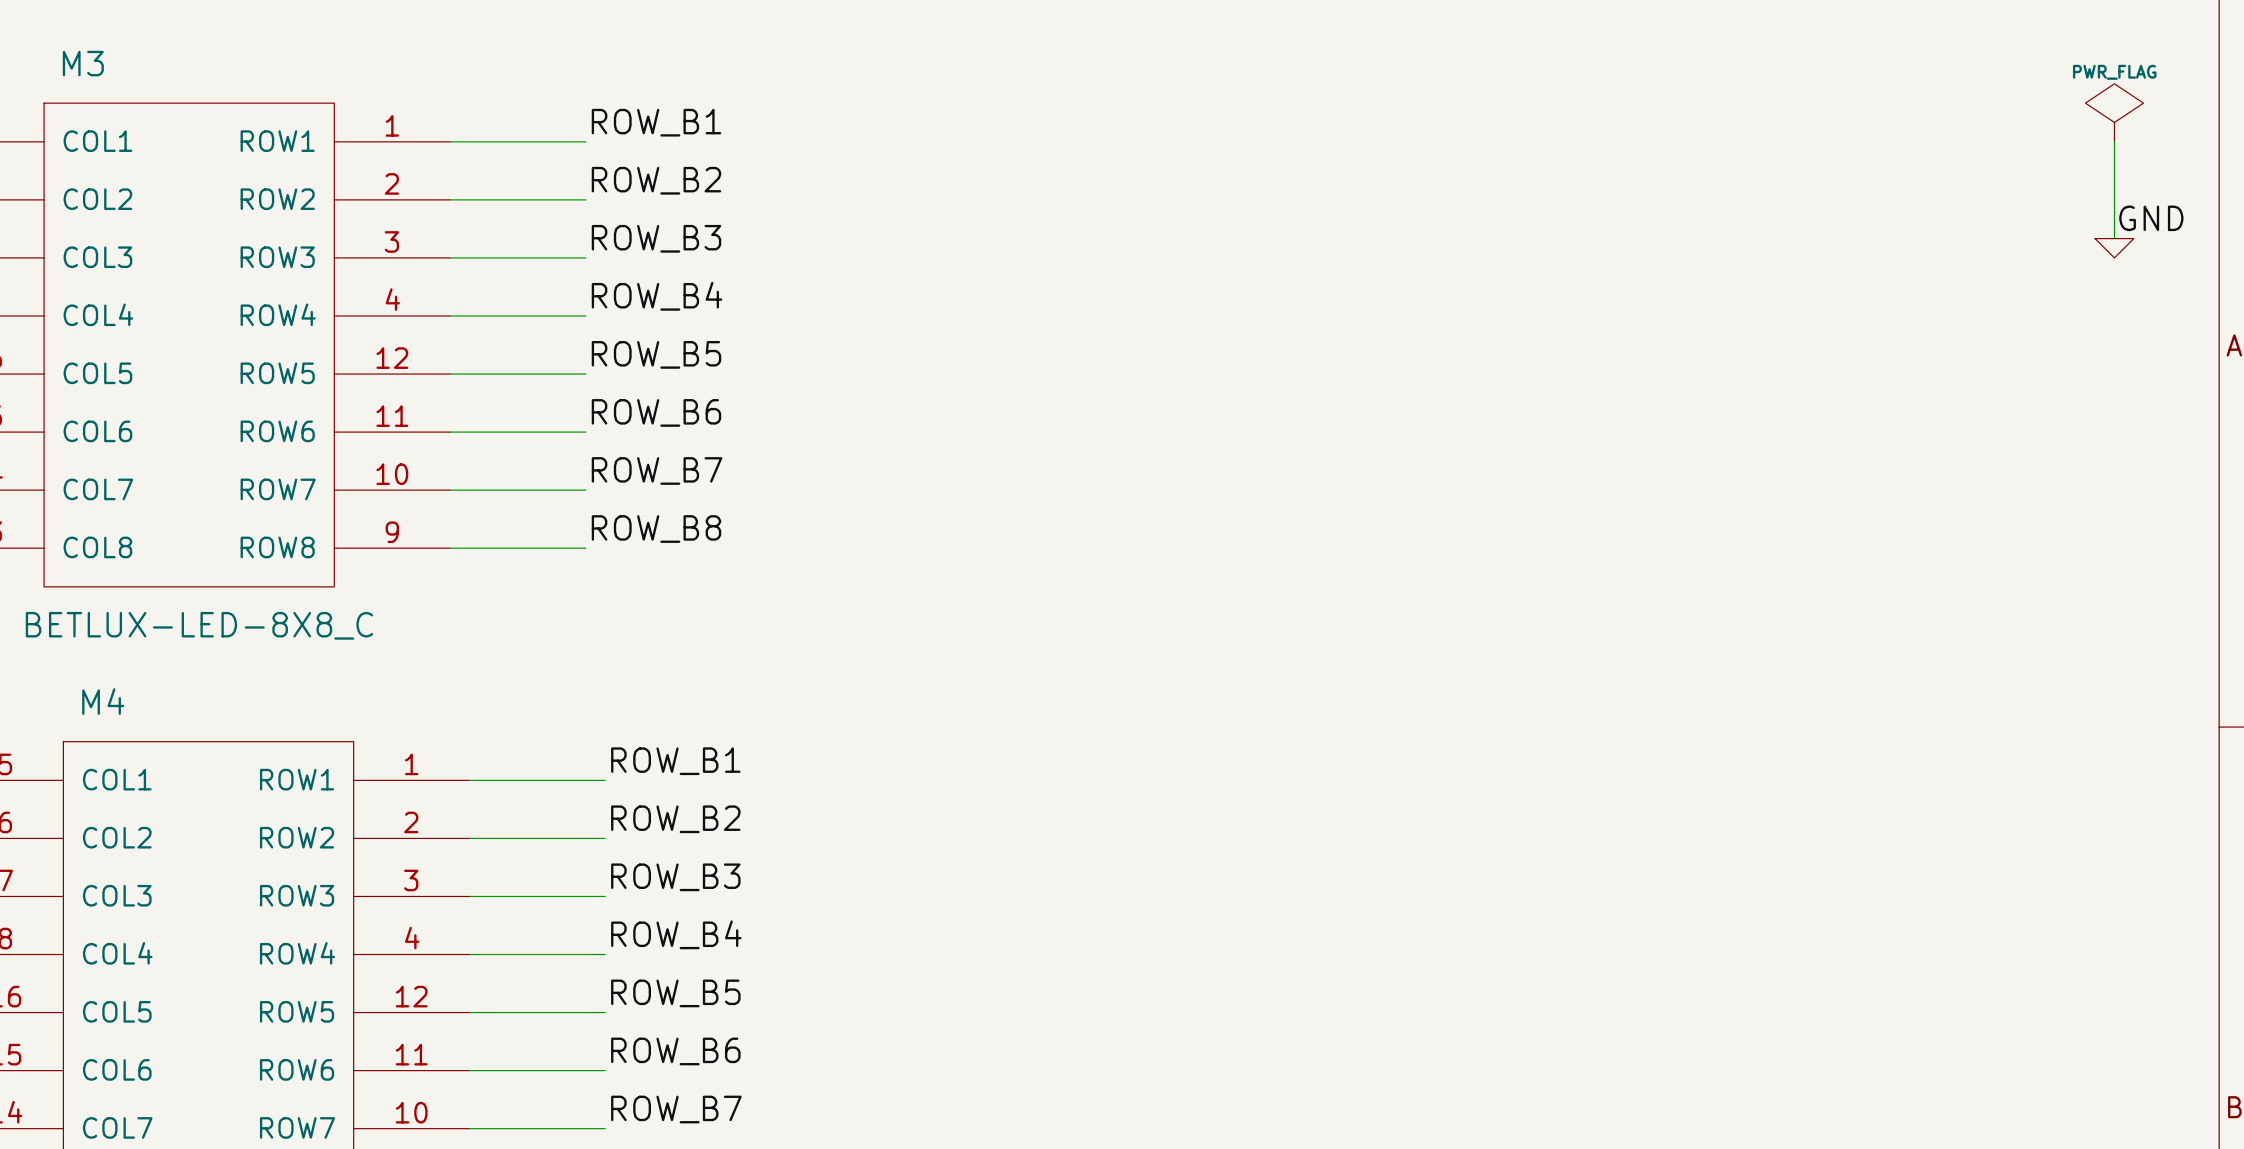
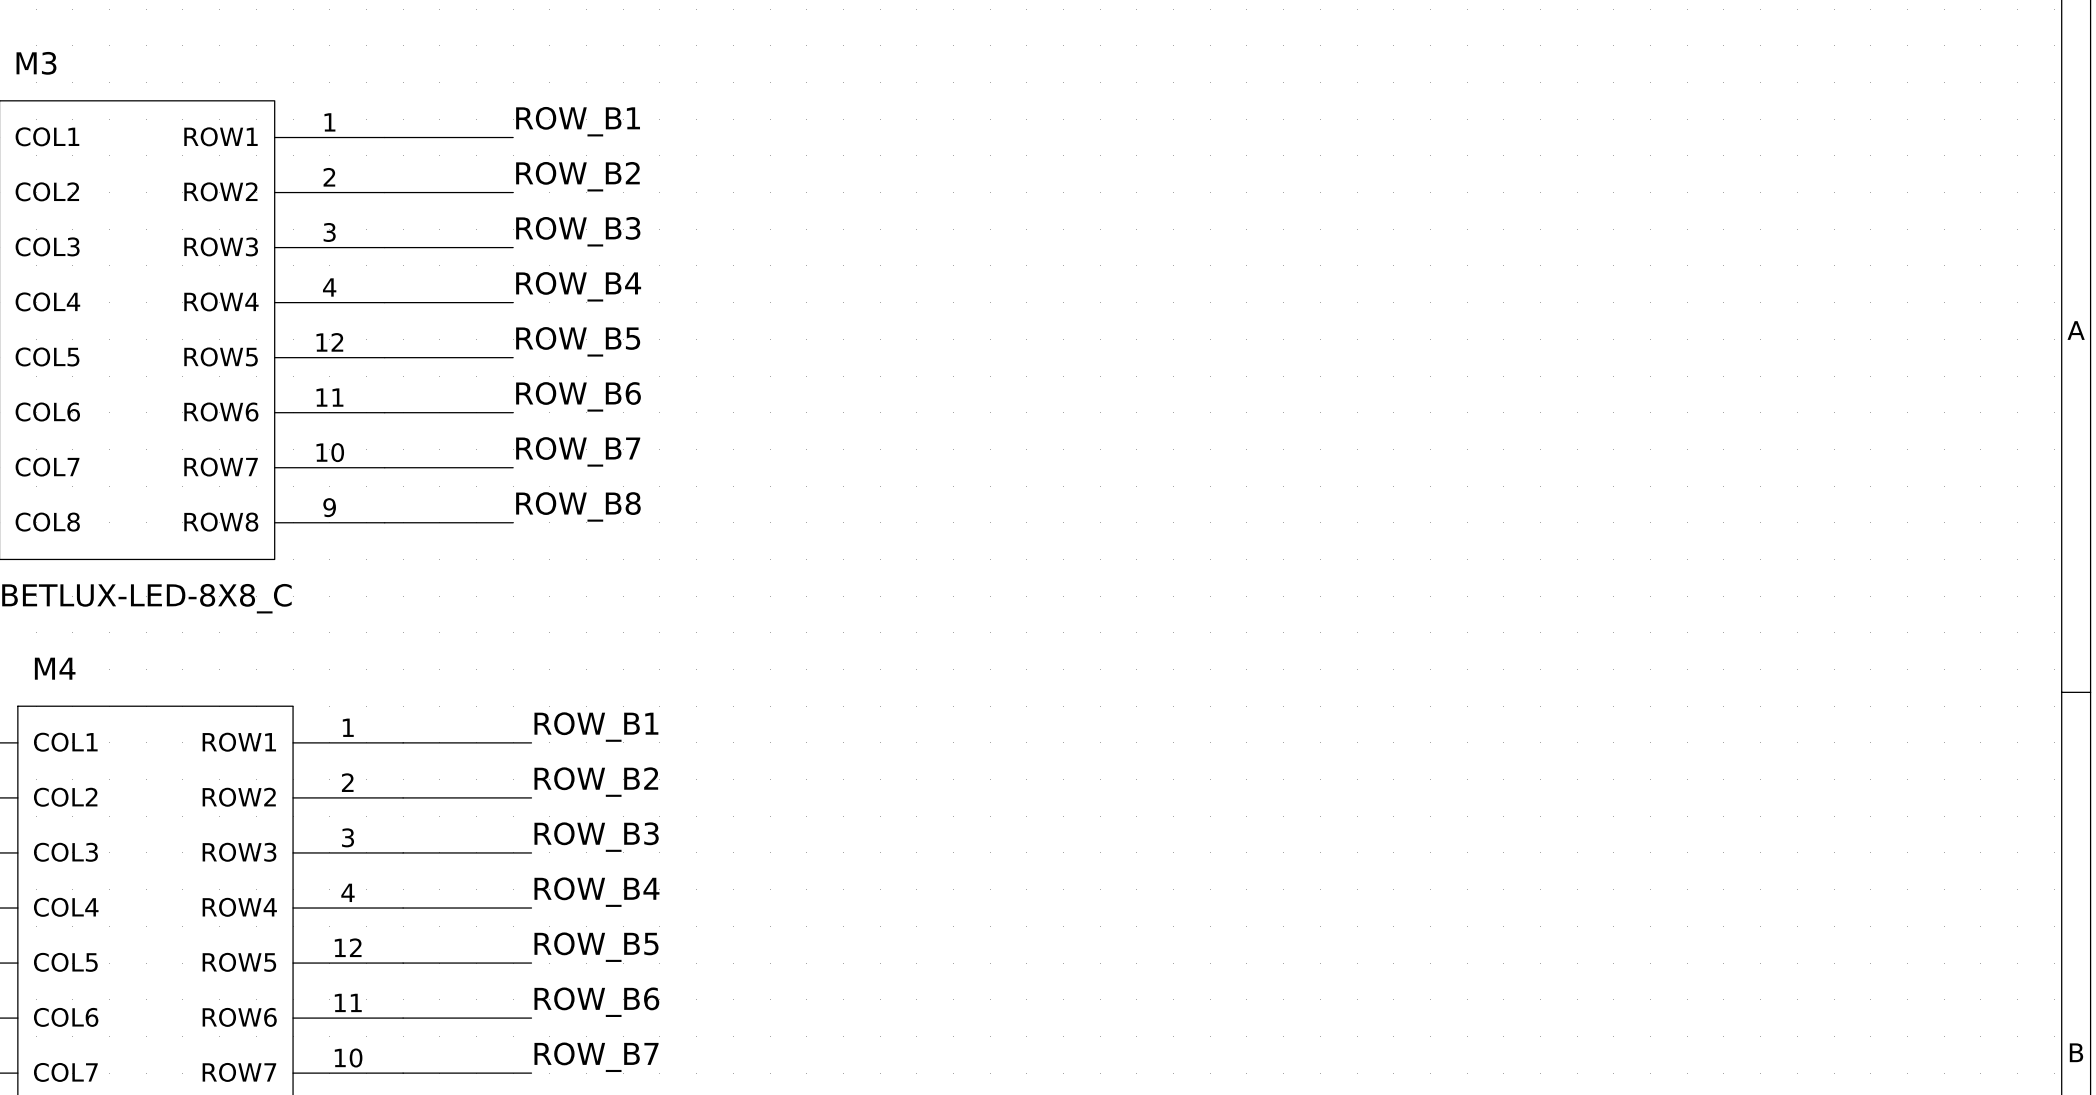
power symbol: PWR_FLAG (2114, 112) -> none
wire: (2114, 141) (2114, 238) -> none
label: GND (2151, 218) -> none
power symbol: (2114, 248) -> none

